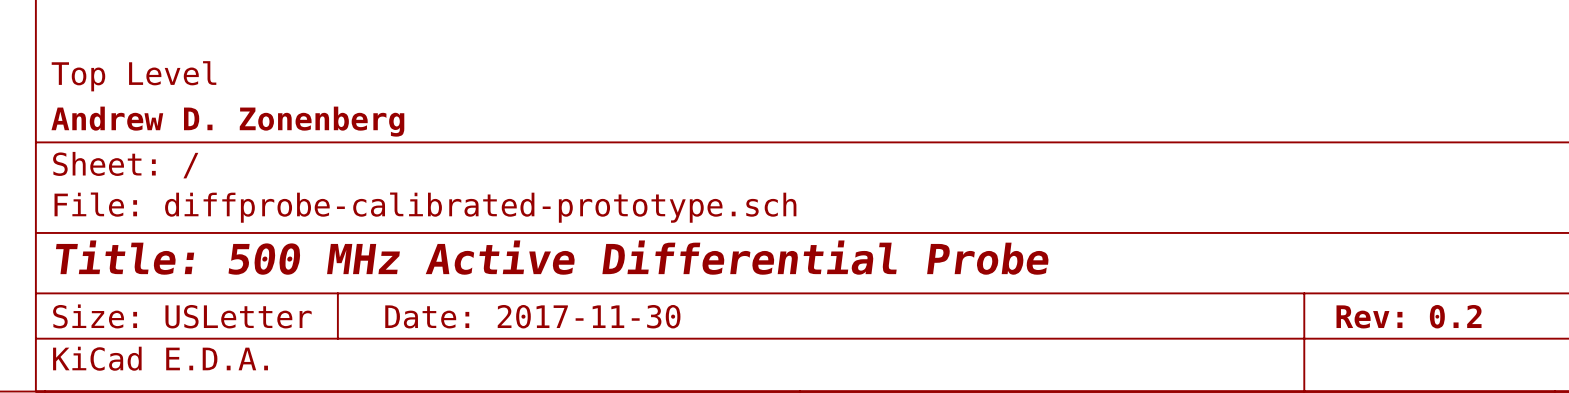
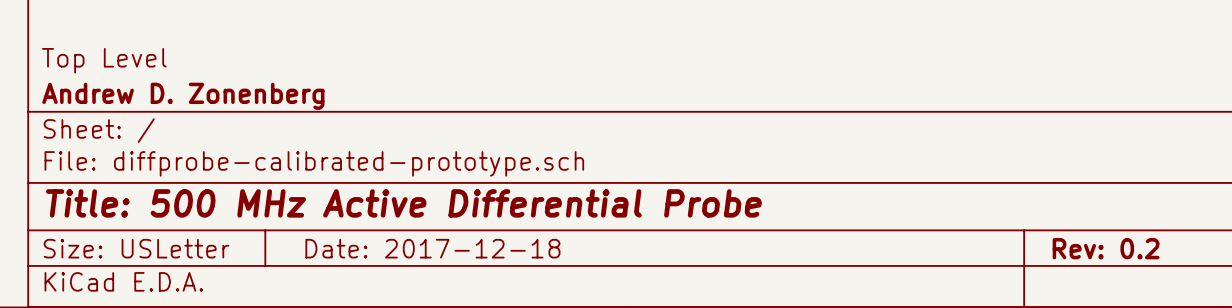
title block: Date: 2017-11-30 (532, 316) -> Date: 2017-12-18 (432, 248)

